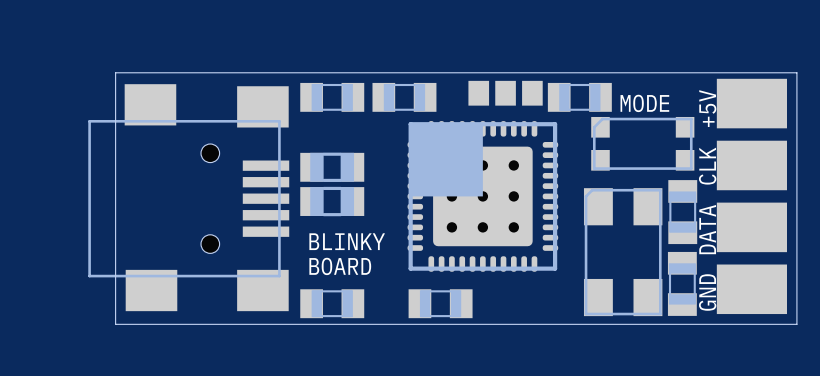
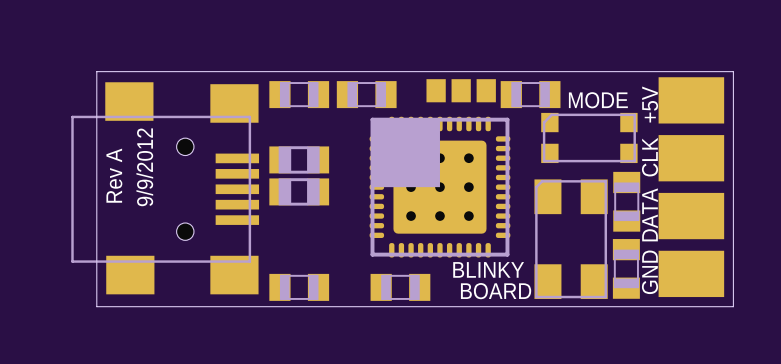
text: none -> 9/9/2012 (144, 167)
text: none -> Rev A (114, 175)
text position: BLINKY (347, 241) -> BLINKY (488, 269)
text position: BOARD (340, 266) -> BOARD (496, 291)

